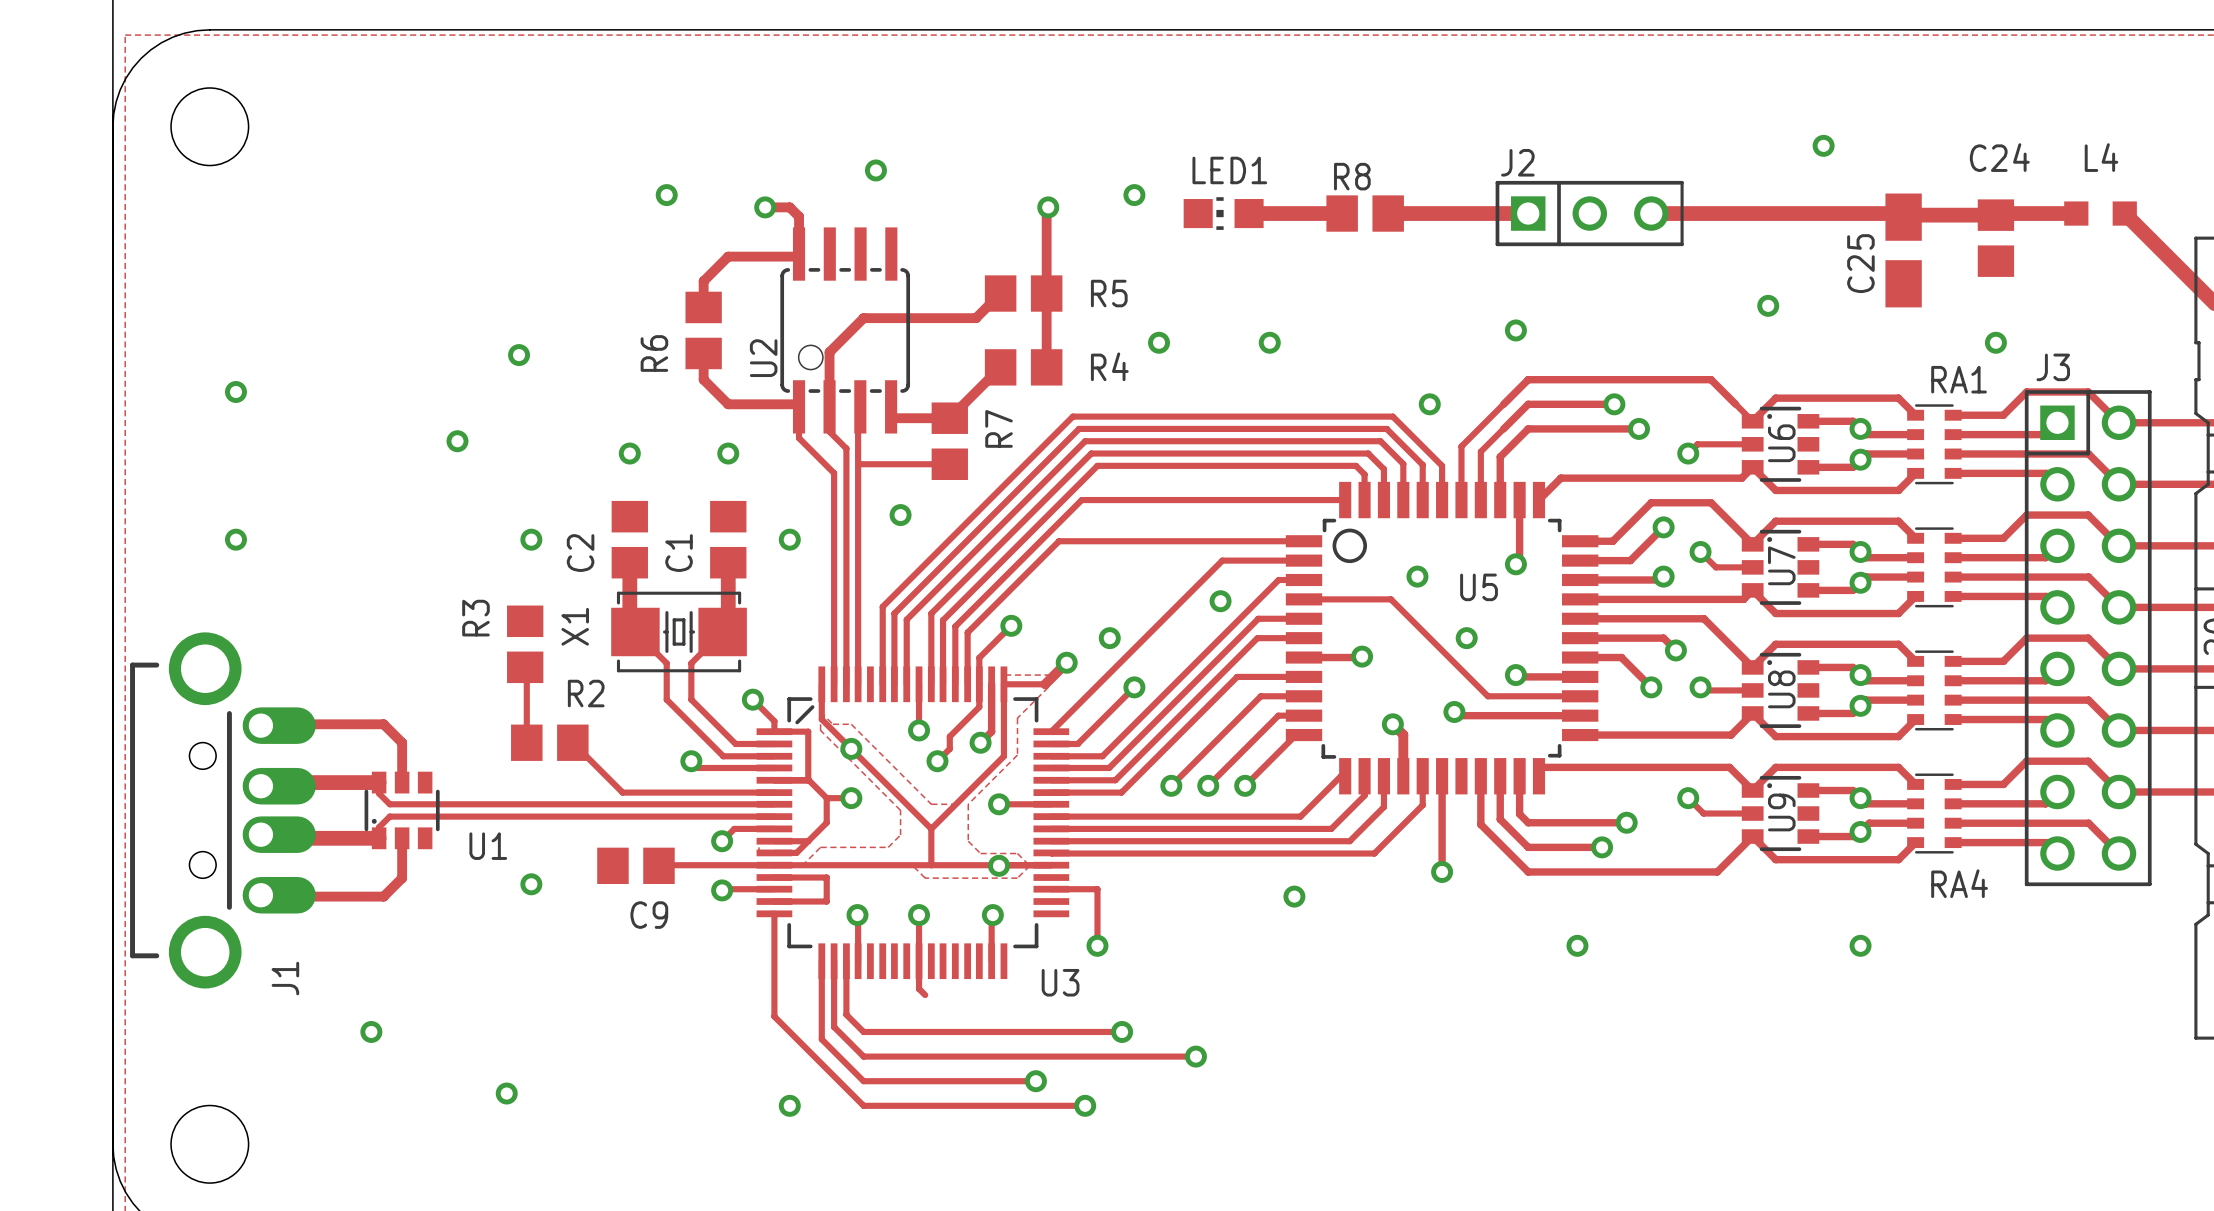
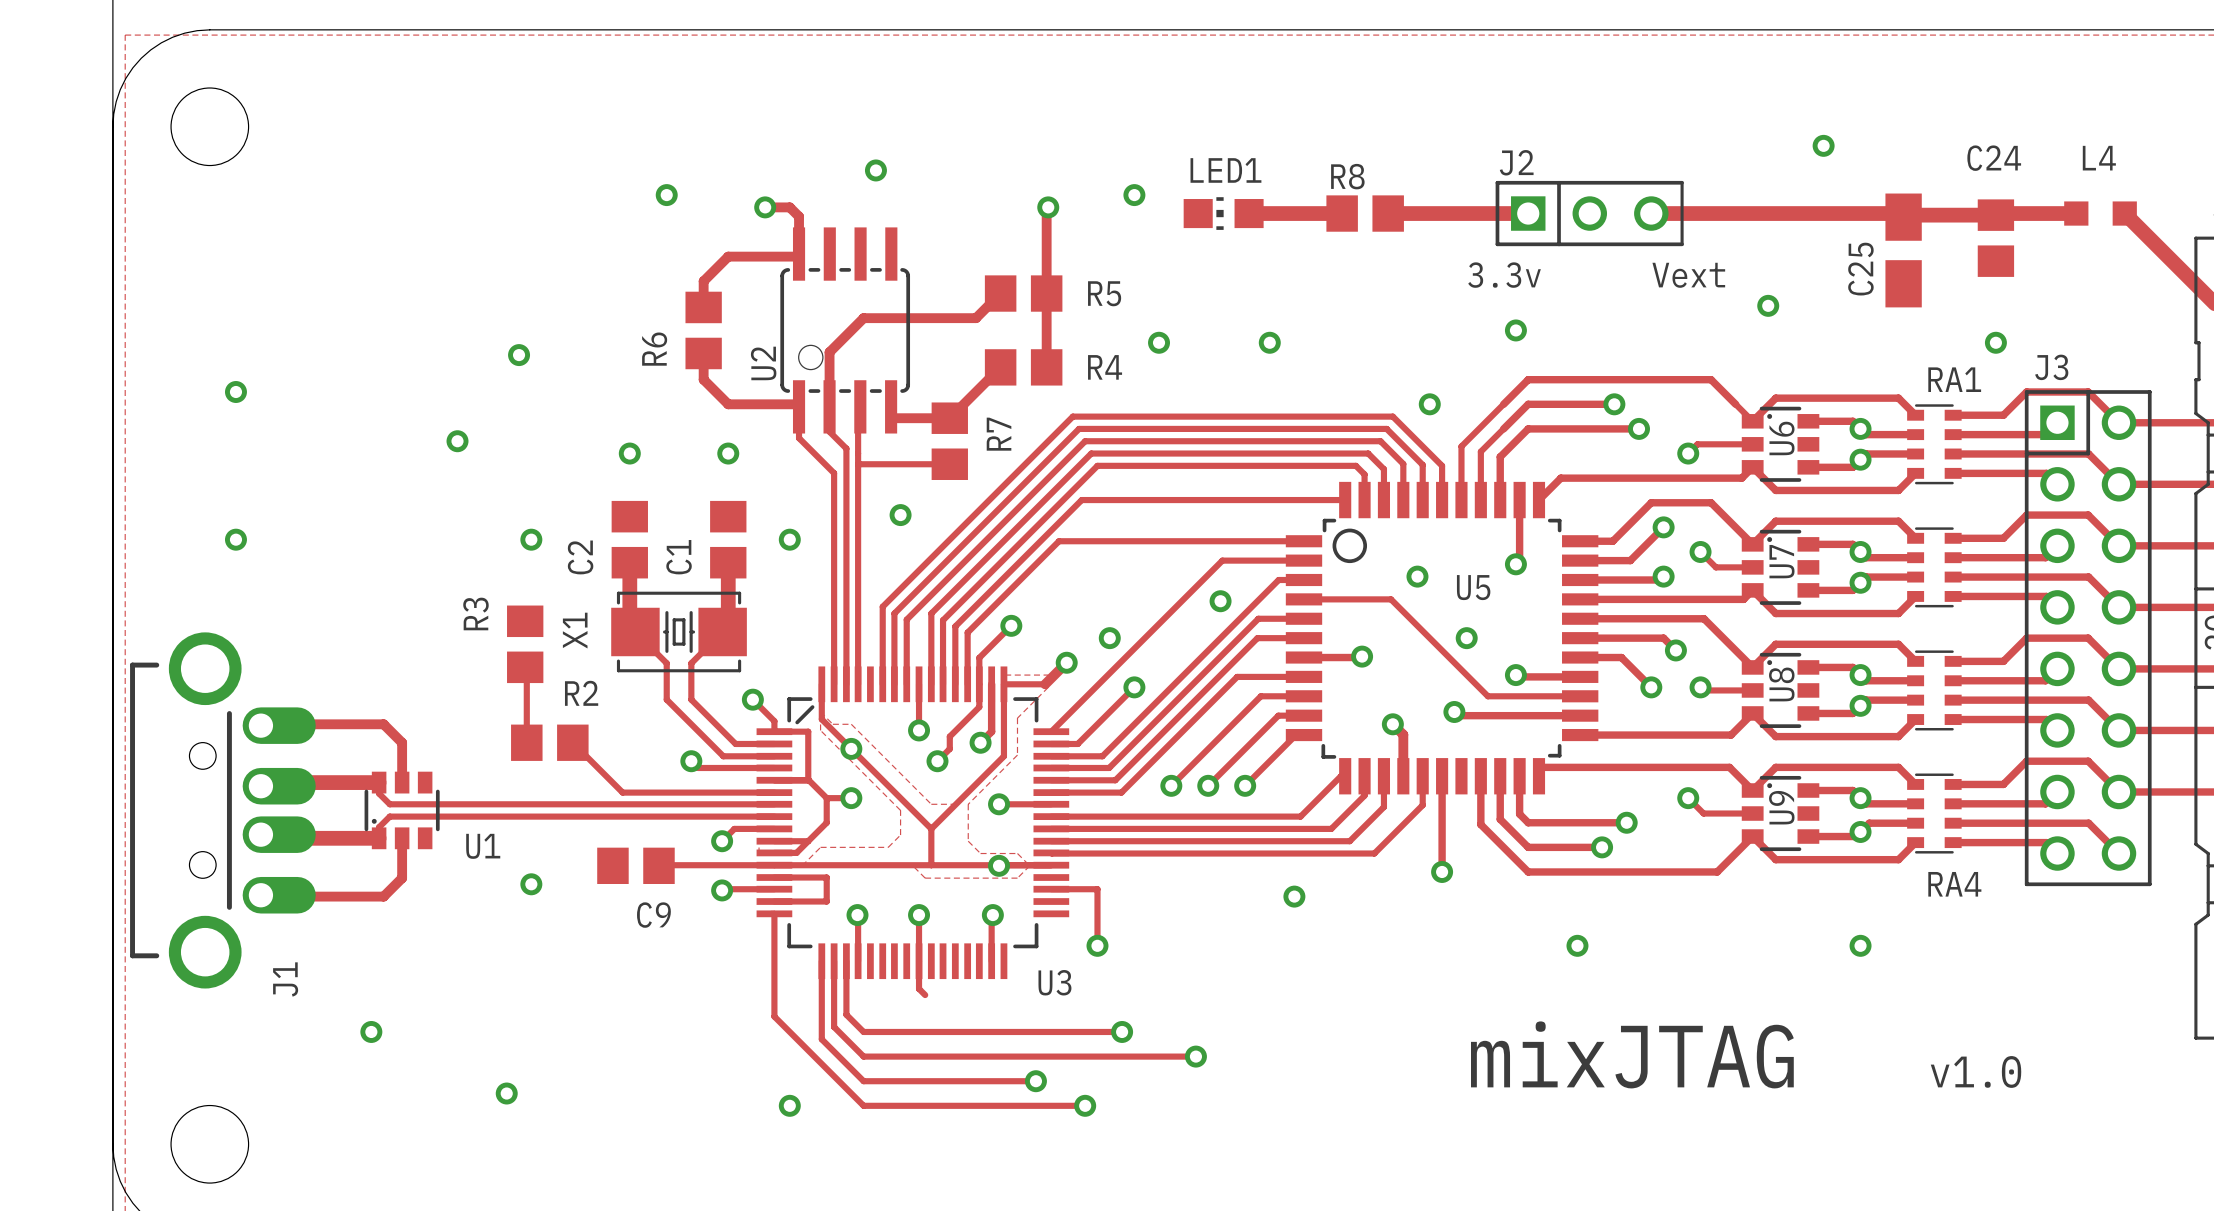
text: none -> 3.3v (1504, 275)
text: none -> Vext (1688, 275)
text: none -> mixJTAG (1632, 1054)
text: none -> v1.0 (1976, 1071)

